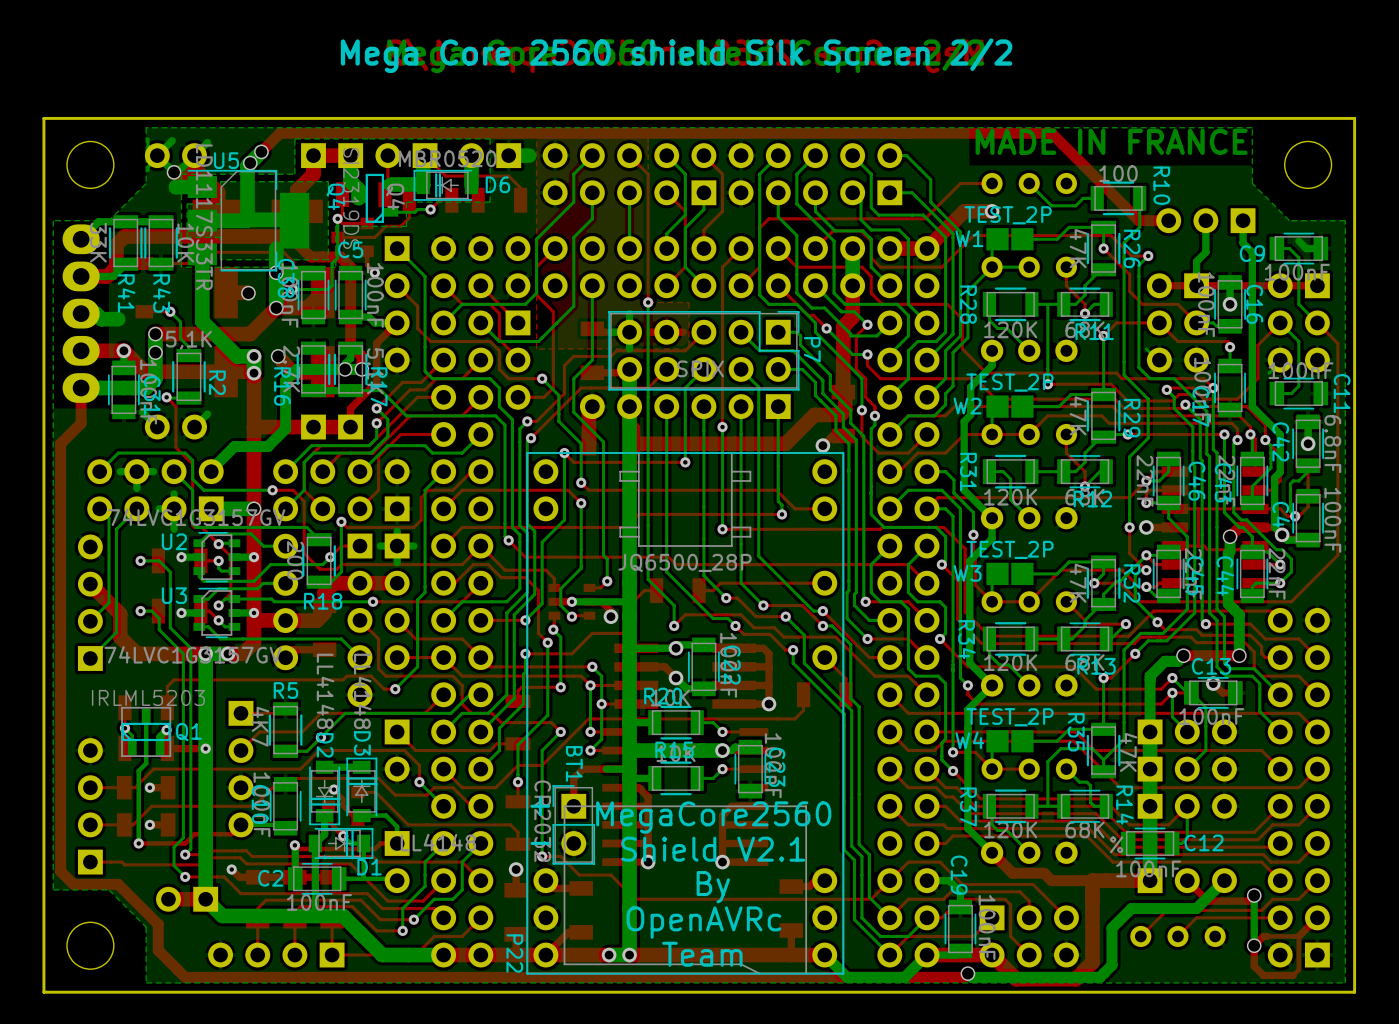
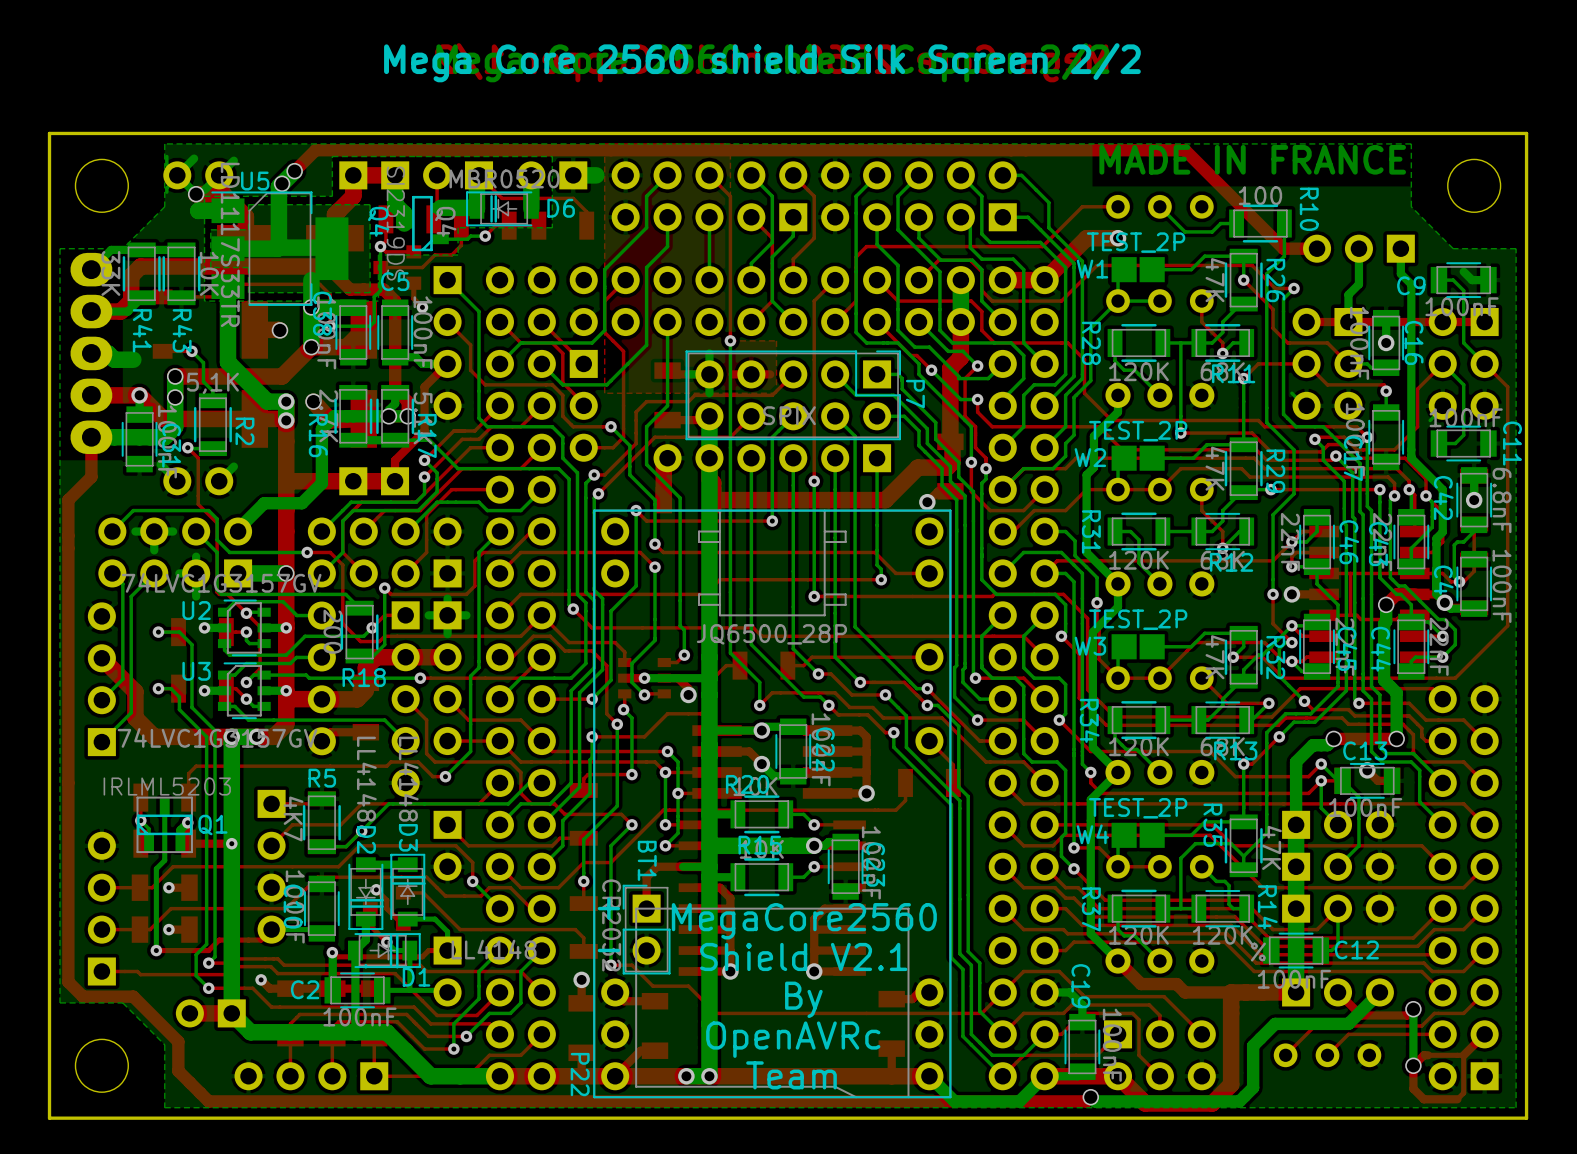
R14 value: 68K (1085, 829) -> 120K (1222, 935)

